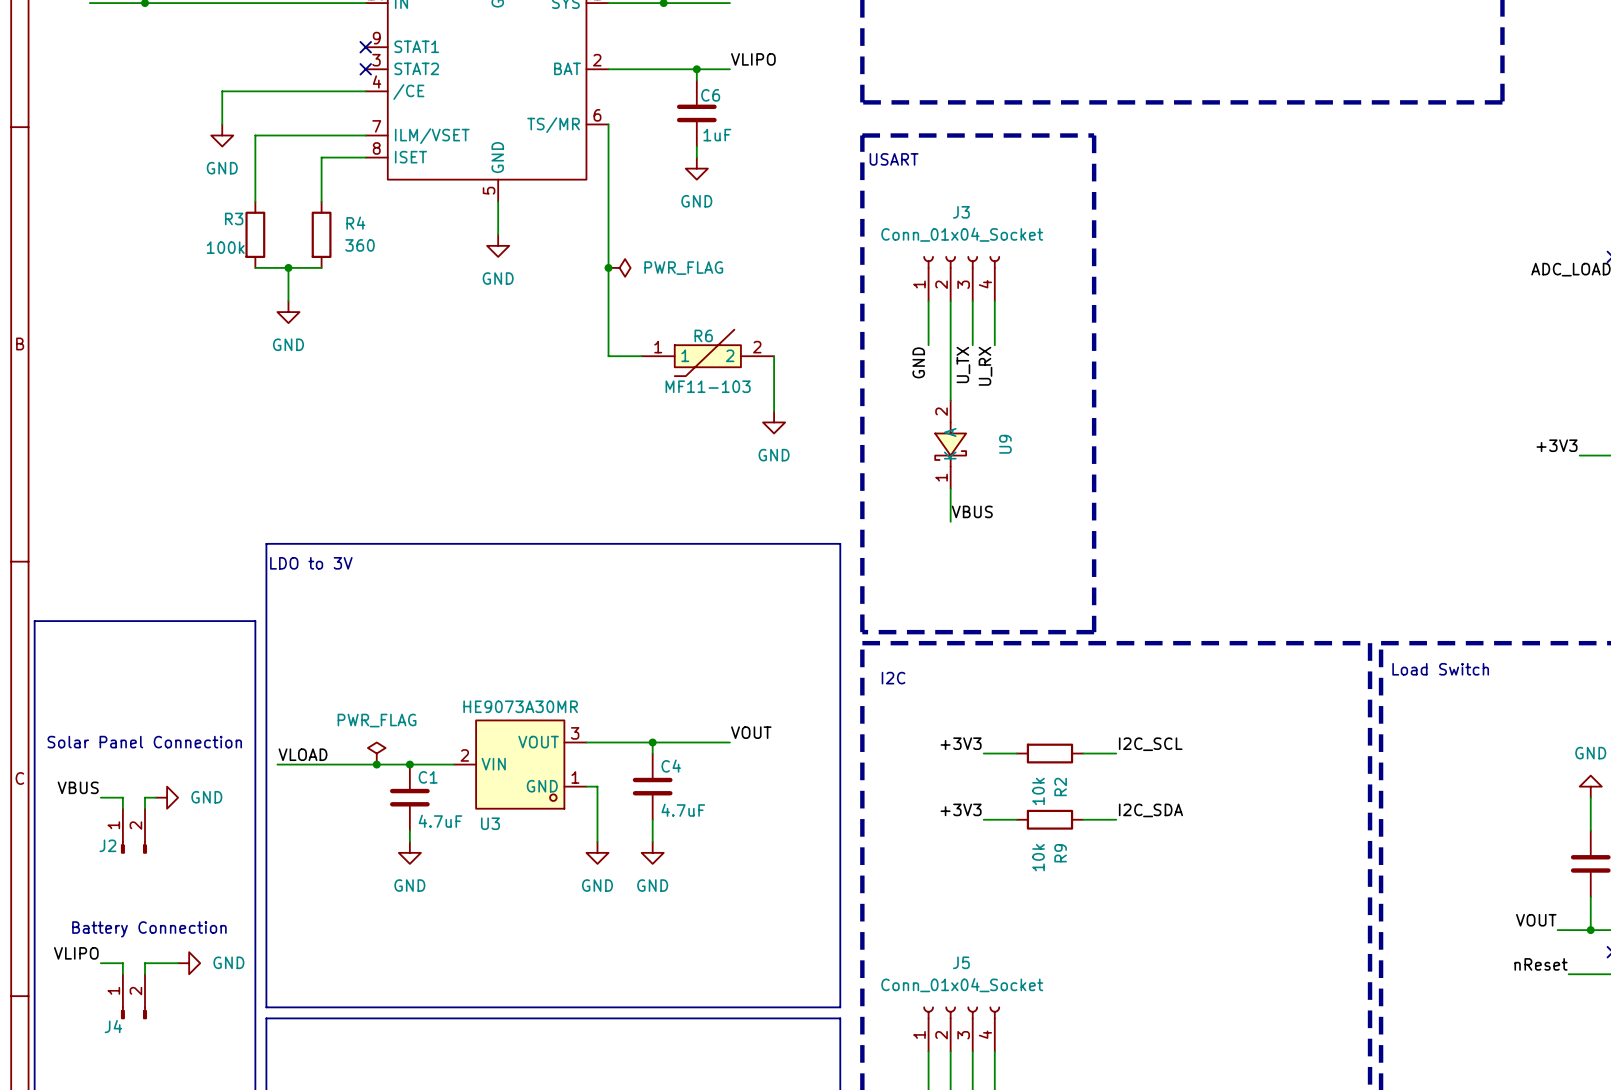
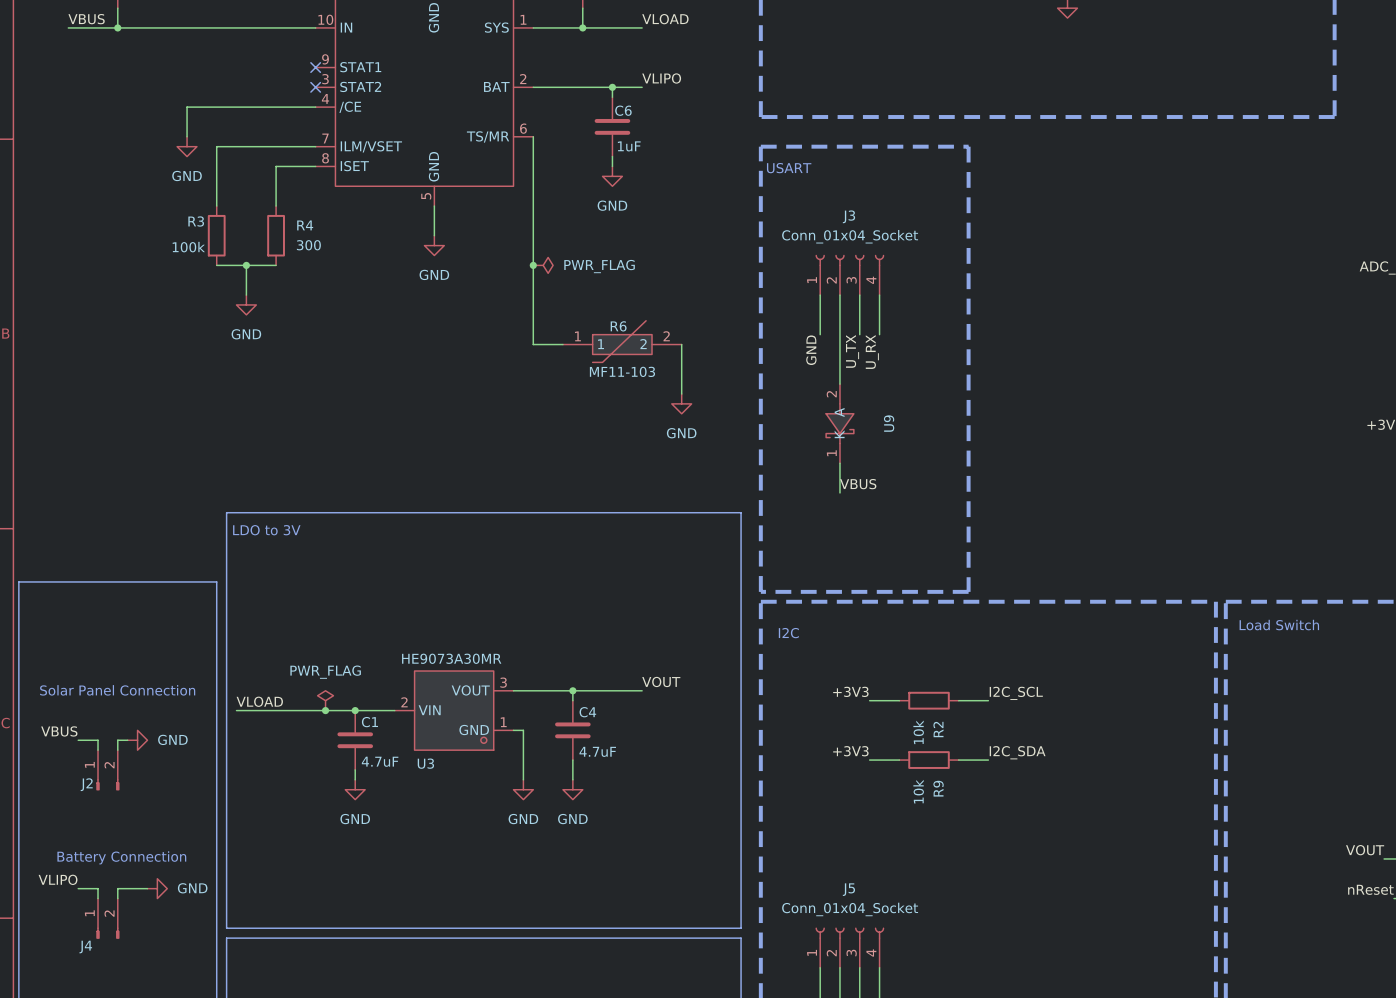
R4 value: 360 (360, 245) -> 300 (308, 245)

